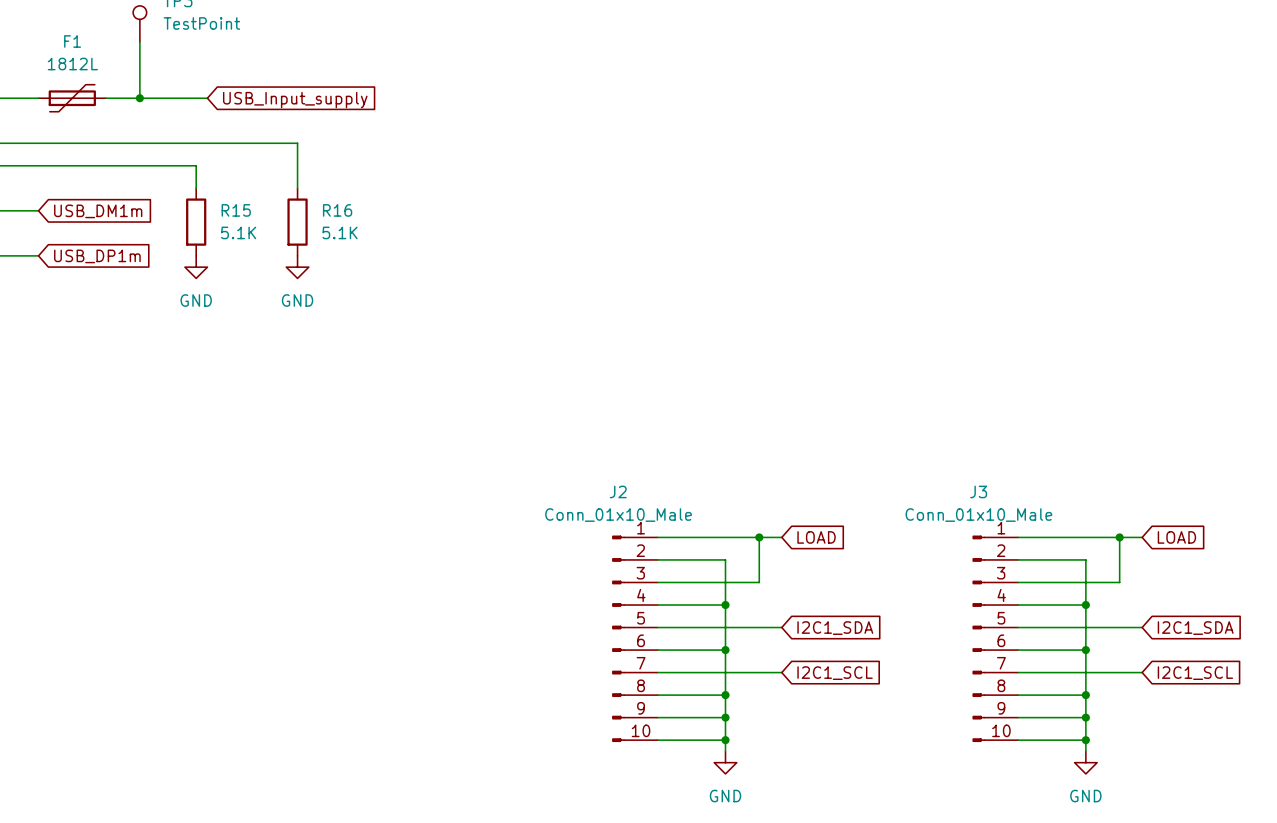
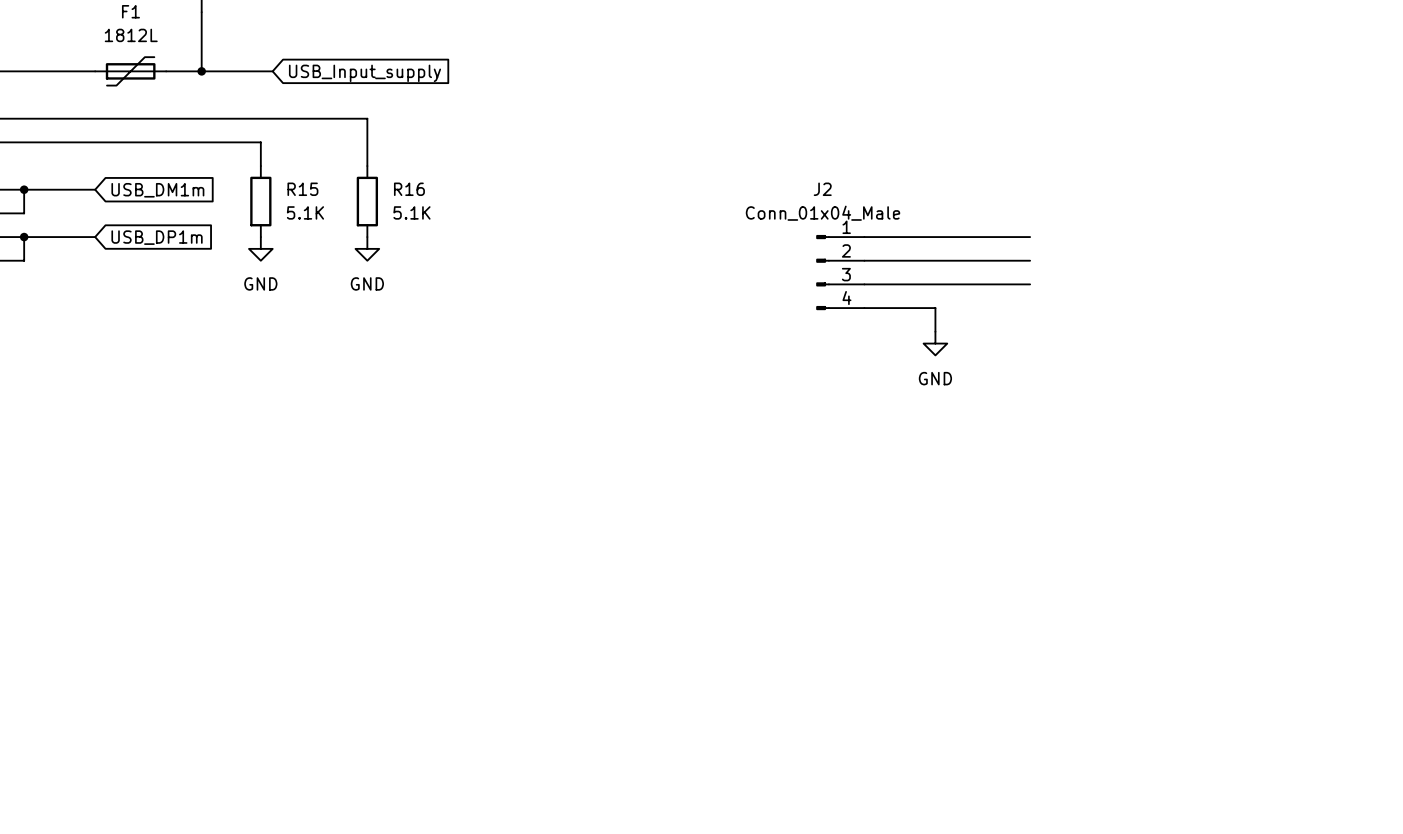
wire: none -> (864, 237) (1030, 237)
wire: none -> (864, 260) (1030, 260)
wire: none -> (864, 284) (1030, 284)
wire: none -> (864, 308) (935, 308) (935, 331)
power symbol: none -> GND (935, 343)
J2 name position: J2 (618, 491) -> J2 (822, 189)
J2 value: Conn_01x10_Male (618, 515) -> Conn_01x04_Male (823, 213)
J2 symbol: [612, 535, 658, 742] -> [816, 235, 865, 310]
wire: (657, 537) (781, 537) -> none
wire: (759, 537) (759, 582) (657, 582) -> none
junction: (759, 537) -> none
global label: LOAD (816, 537) -> none
wire: (1018, 537) (1142, 537) -> none
wire: (1119, 537) (1119, 582) (1018, 582) -> none
junction: (1119, 537) -> none
global label: LOAD (1176, 537) -> none
wire: (657, 559) (725, 559) (725, 751) -> none
wire: (1018, 559) (1085, 559) (1085, 751) -> none
wire: (657, 605) (725, 605) -> none
junction: (725, 605) -> none
wire: (1018, 605) (1085, 605) -> none
junction: (1085, 605) -> none
wire: (657, 627) (781, 627) -> none
wire: (1018, 627) (1142, 627) -> none
global label: I2C1_SDA (835, 628) -> none
global label: I2C1_SDA (1195, 628) -> none
J3: Conn_01x10_Male (995, 638) -> none
wire: (657, 650) (725, 650) -> none
junction: (725, 650) -> none
wire: (1018, 650) (1085, 650) -> none
junction: (1085, 650) -> none
wire: (657, 672) (781, 672) -> none
wire: (1018, 672) (1142, 672) -> none
global label: I2C1_SCL (835, 673) -> none
global label: I2C1_SCL (1195, 673) -> none
wire: (657, 695) (725, 695) -> none
junction: (725, 695) -> none
wire: (1018, 695) (1085, 695) -> none
junction: (1085, 695) -> none
wire: (657, 717) (725, 717) -> none
junction: (725, 717) -> none
wire: (1018, 717) (1085, 717) -> none
junction: (1085, 717) -> none
wire: (657, 740) (725, 740) -> none
junction: (725, 740) -> none
wire: (1018, 740) (1085, 740) -> none
junction: (1085, 740) -> none
power symbol: GND (725, 762) -> none
power symbol: GND (1085, 762) -> none

